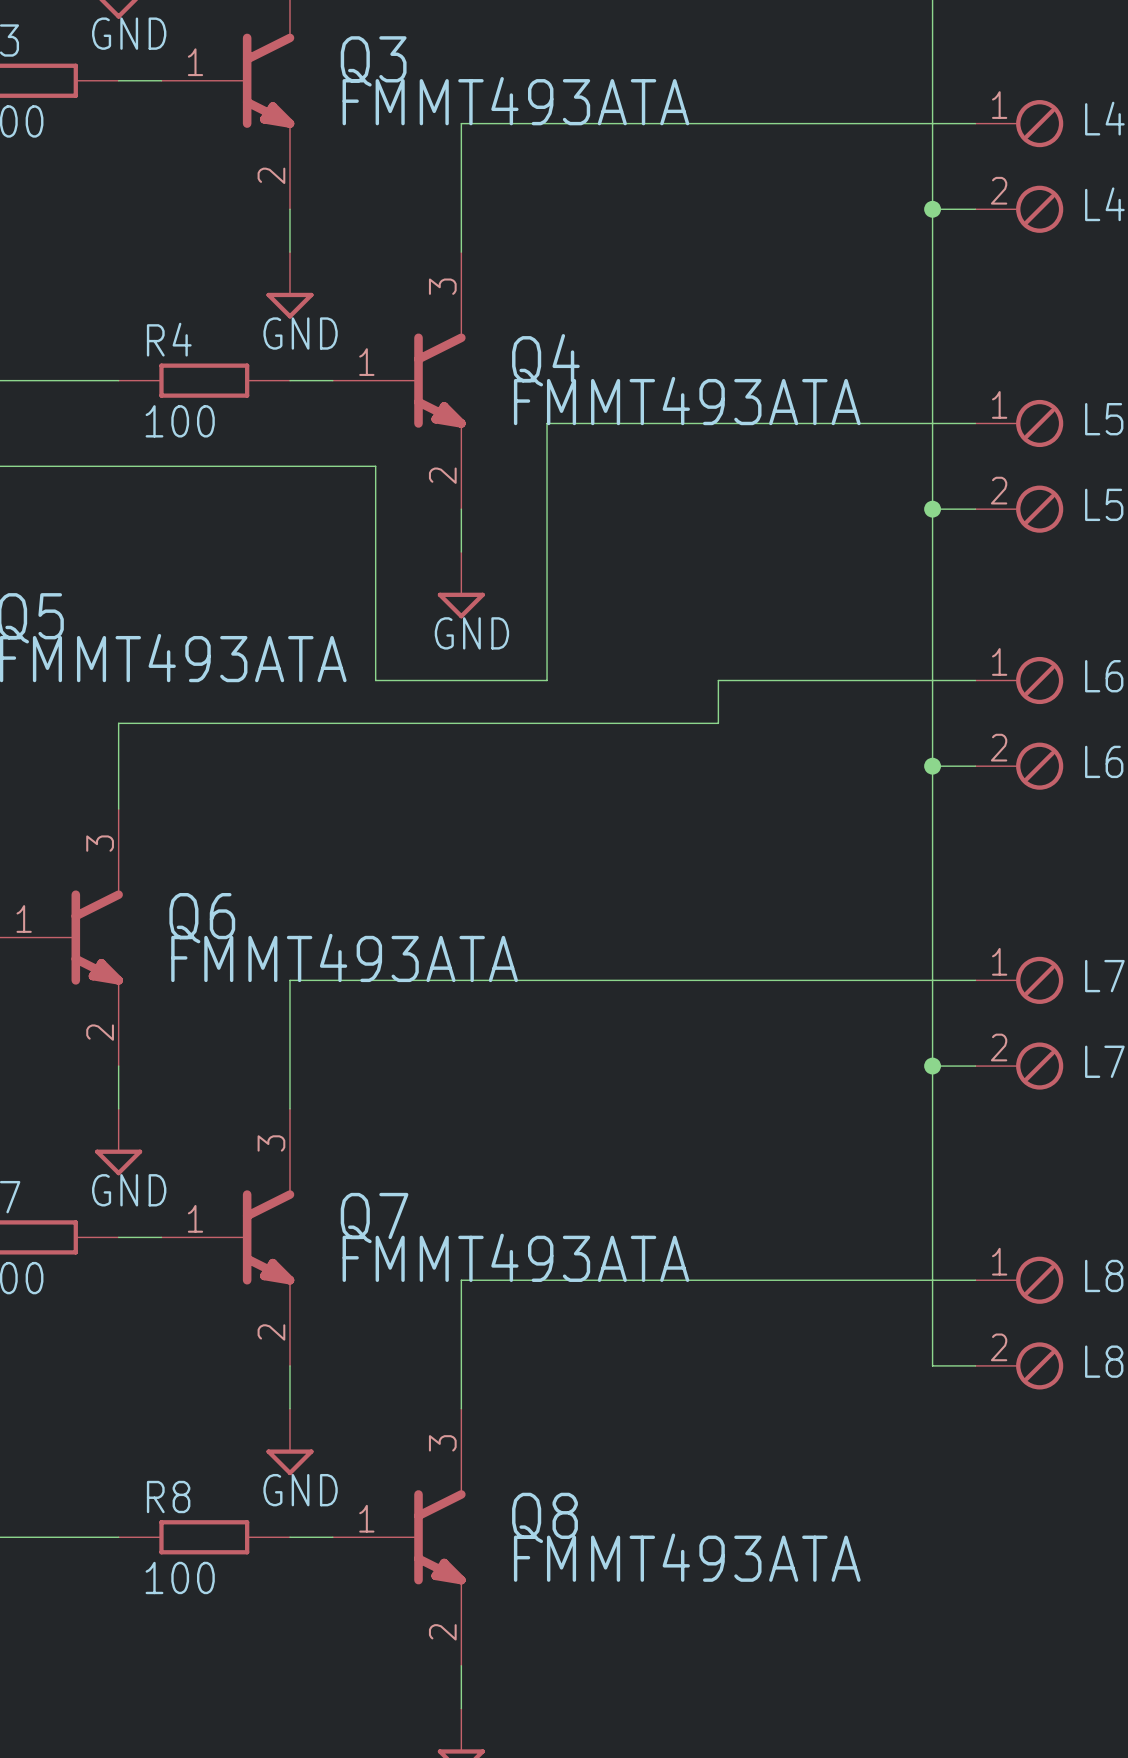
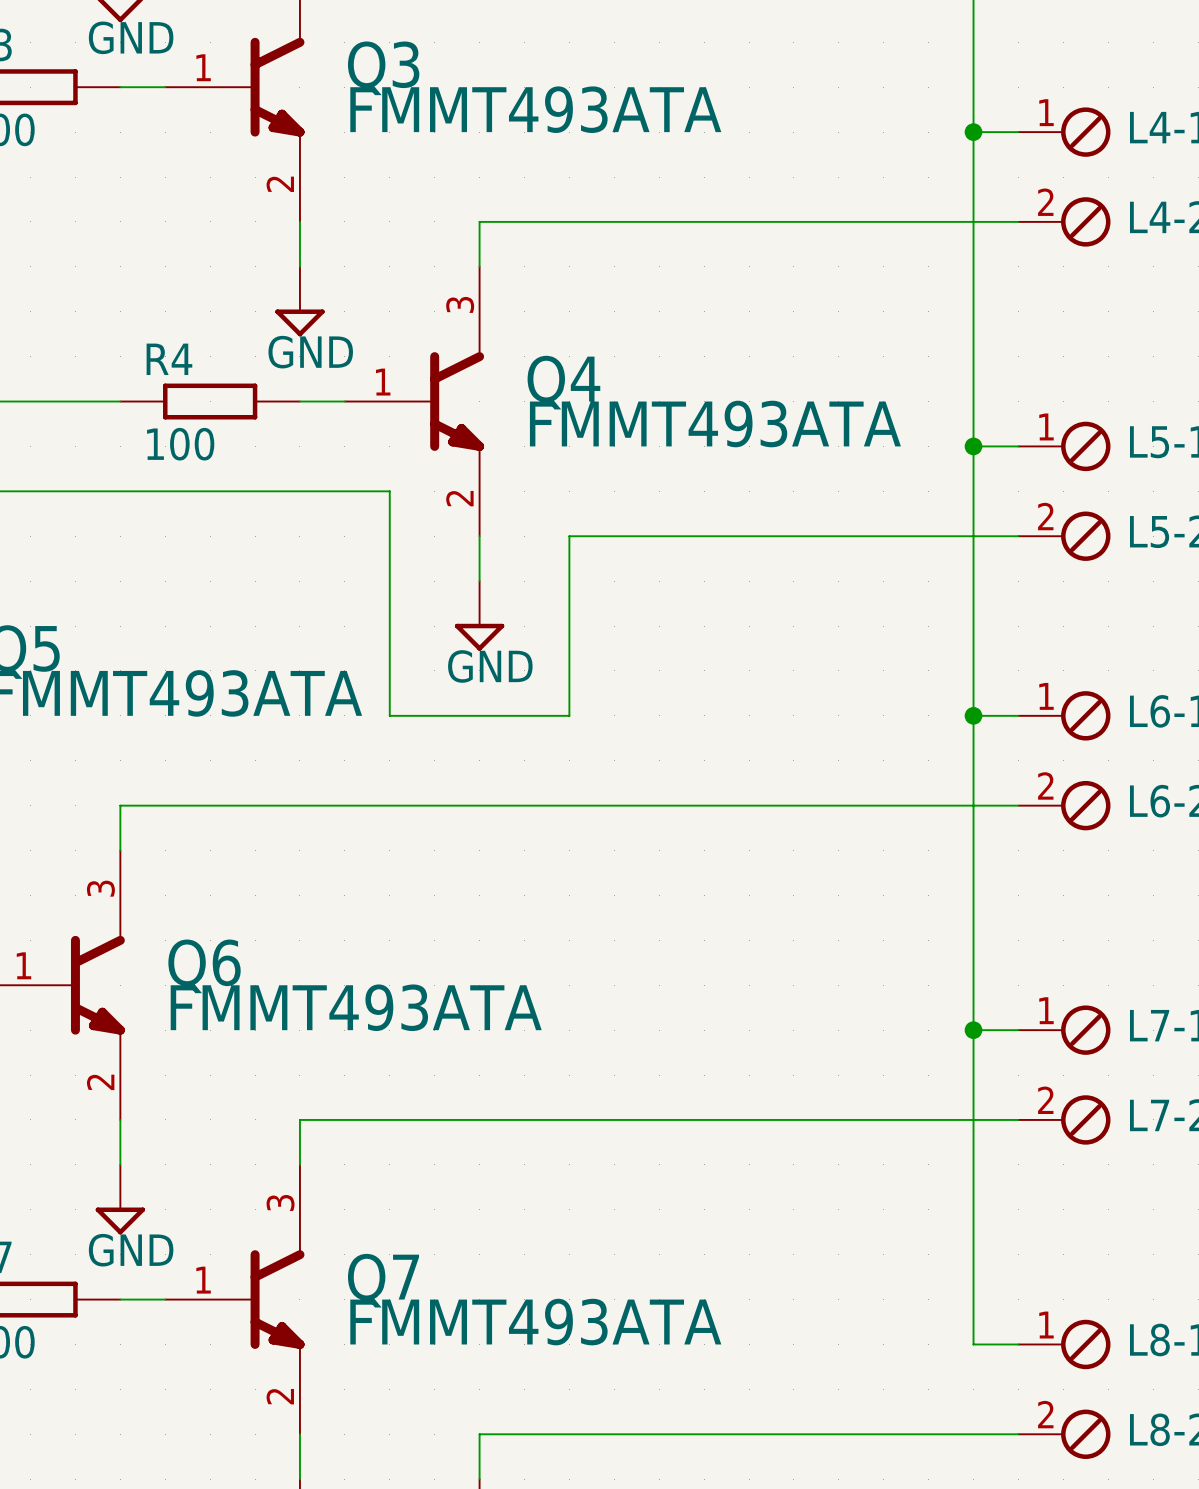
wire: (932, 123) (461, 123) (461, 209) -> (973, 221) (479, 221)
junction position: (932, 209) -> (973, 132)
wire: (932, 423) (547, 423) (547, 509) -> (973, 536) (569, 536)
junction: none -> (973, 446)
junction: (932, 509) -> none
wire: (932, 680) (718, 680) (718, 723) (118, 723) (118, 766) -> (973, 805) (120, 805)
junction: none -> (973, 715)
junction: (932, 766) -> none
wire: (932, 980) (289, 980) (289, 1066) -> (973, 1119) (299, 1119)
junction position: (932, 1066) -> (973, 1030)
wire: (461, 1365) (461, 1280) (932, 1280) (932, 1365) -> (479, 1434) (973, 1434)

